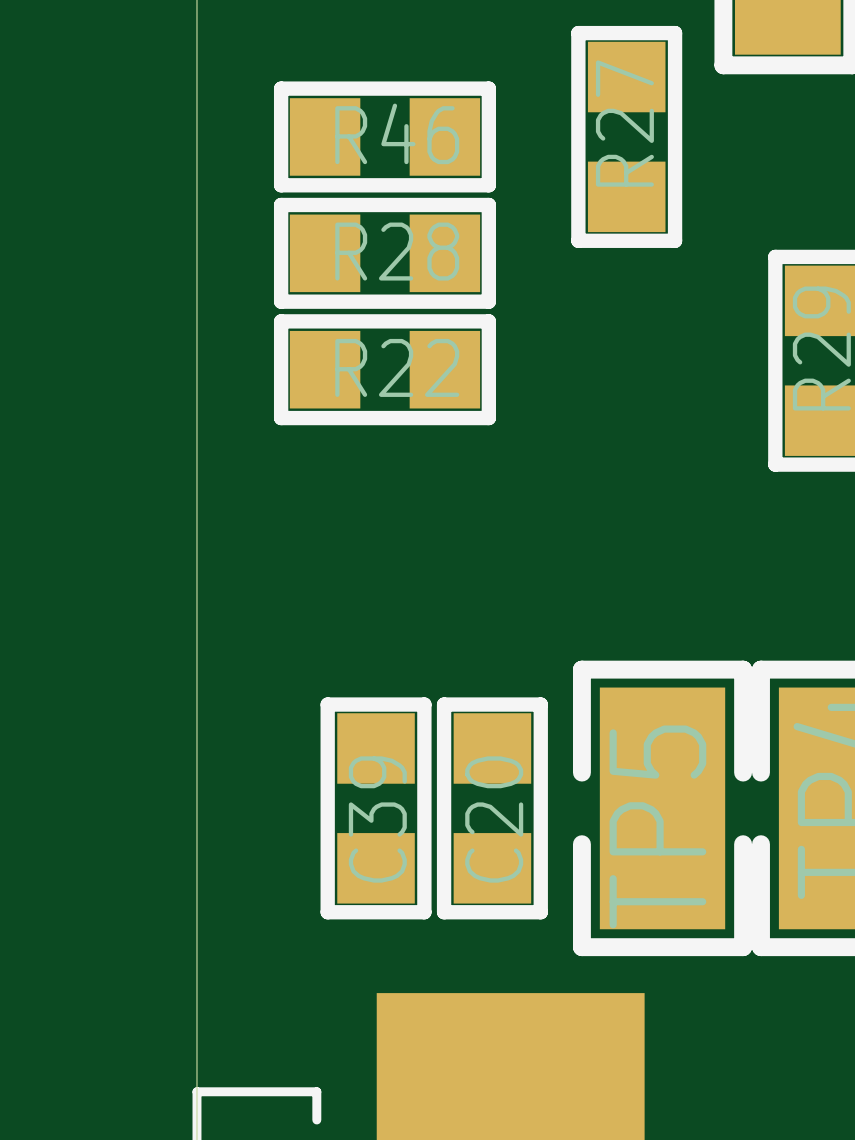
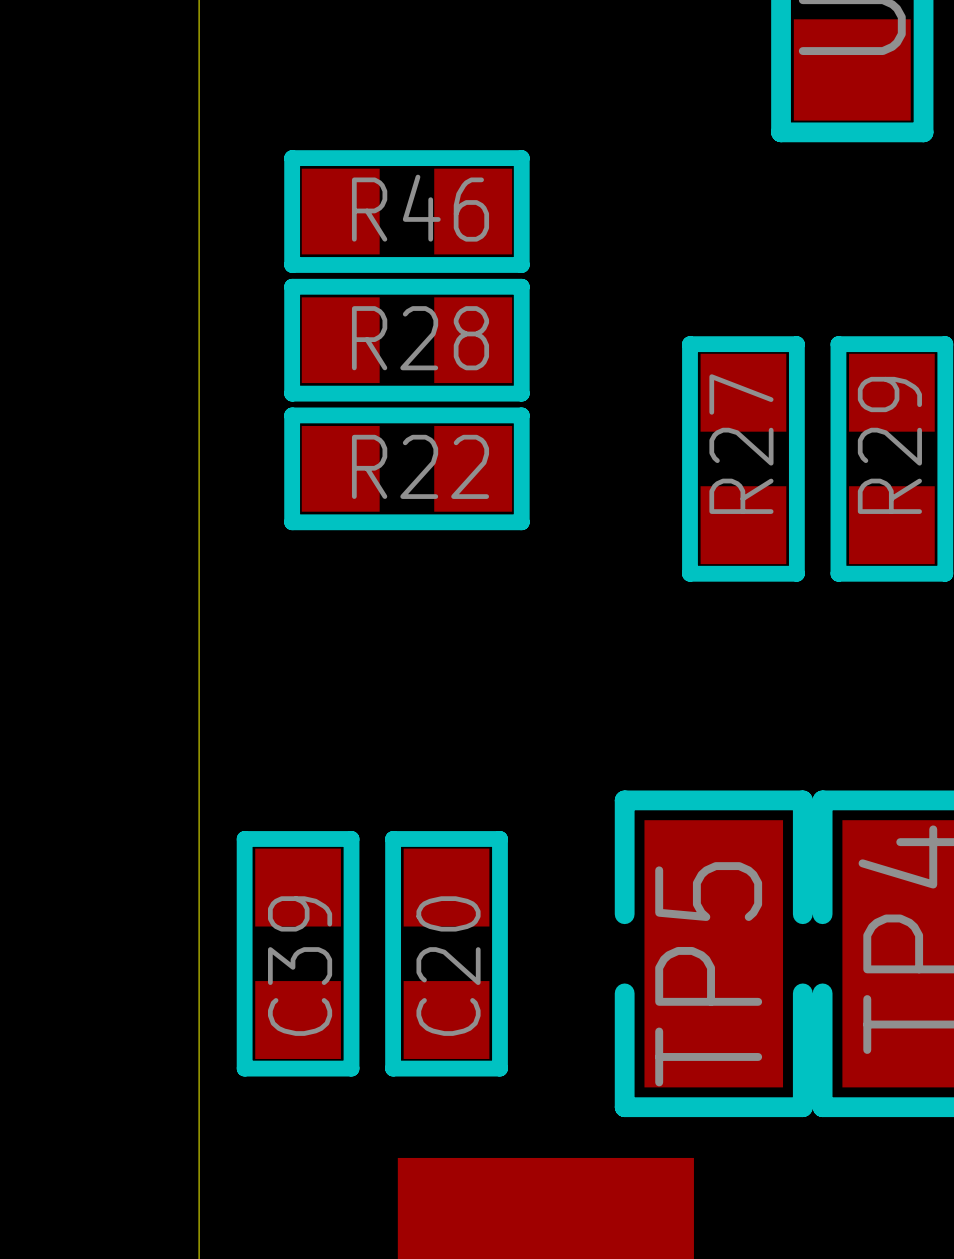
R27 position: (626, 136) -> (743, 458)
C39 position: (376, 808) -> (298, 953)
C20 position: (492, 808) -> (446, 953)

